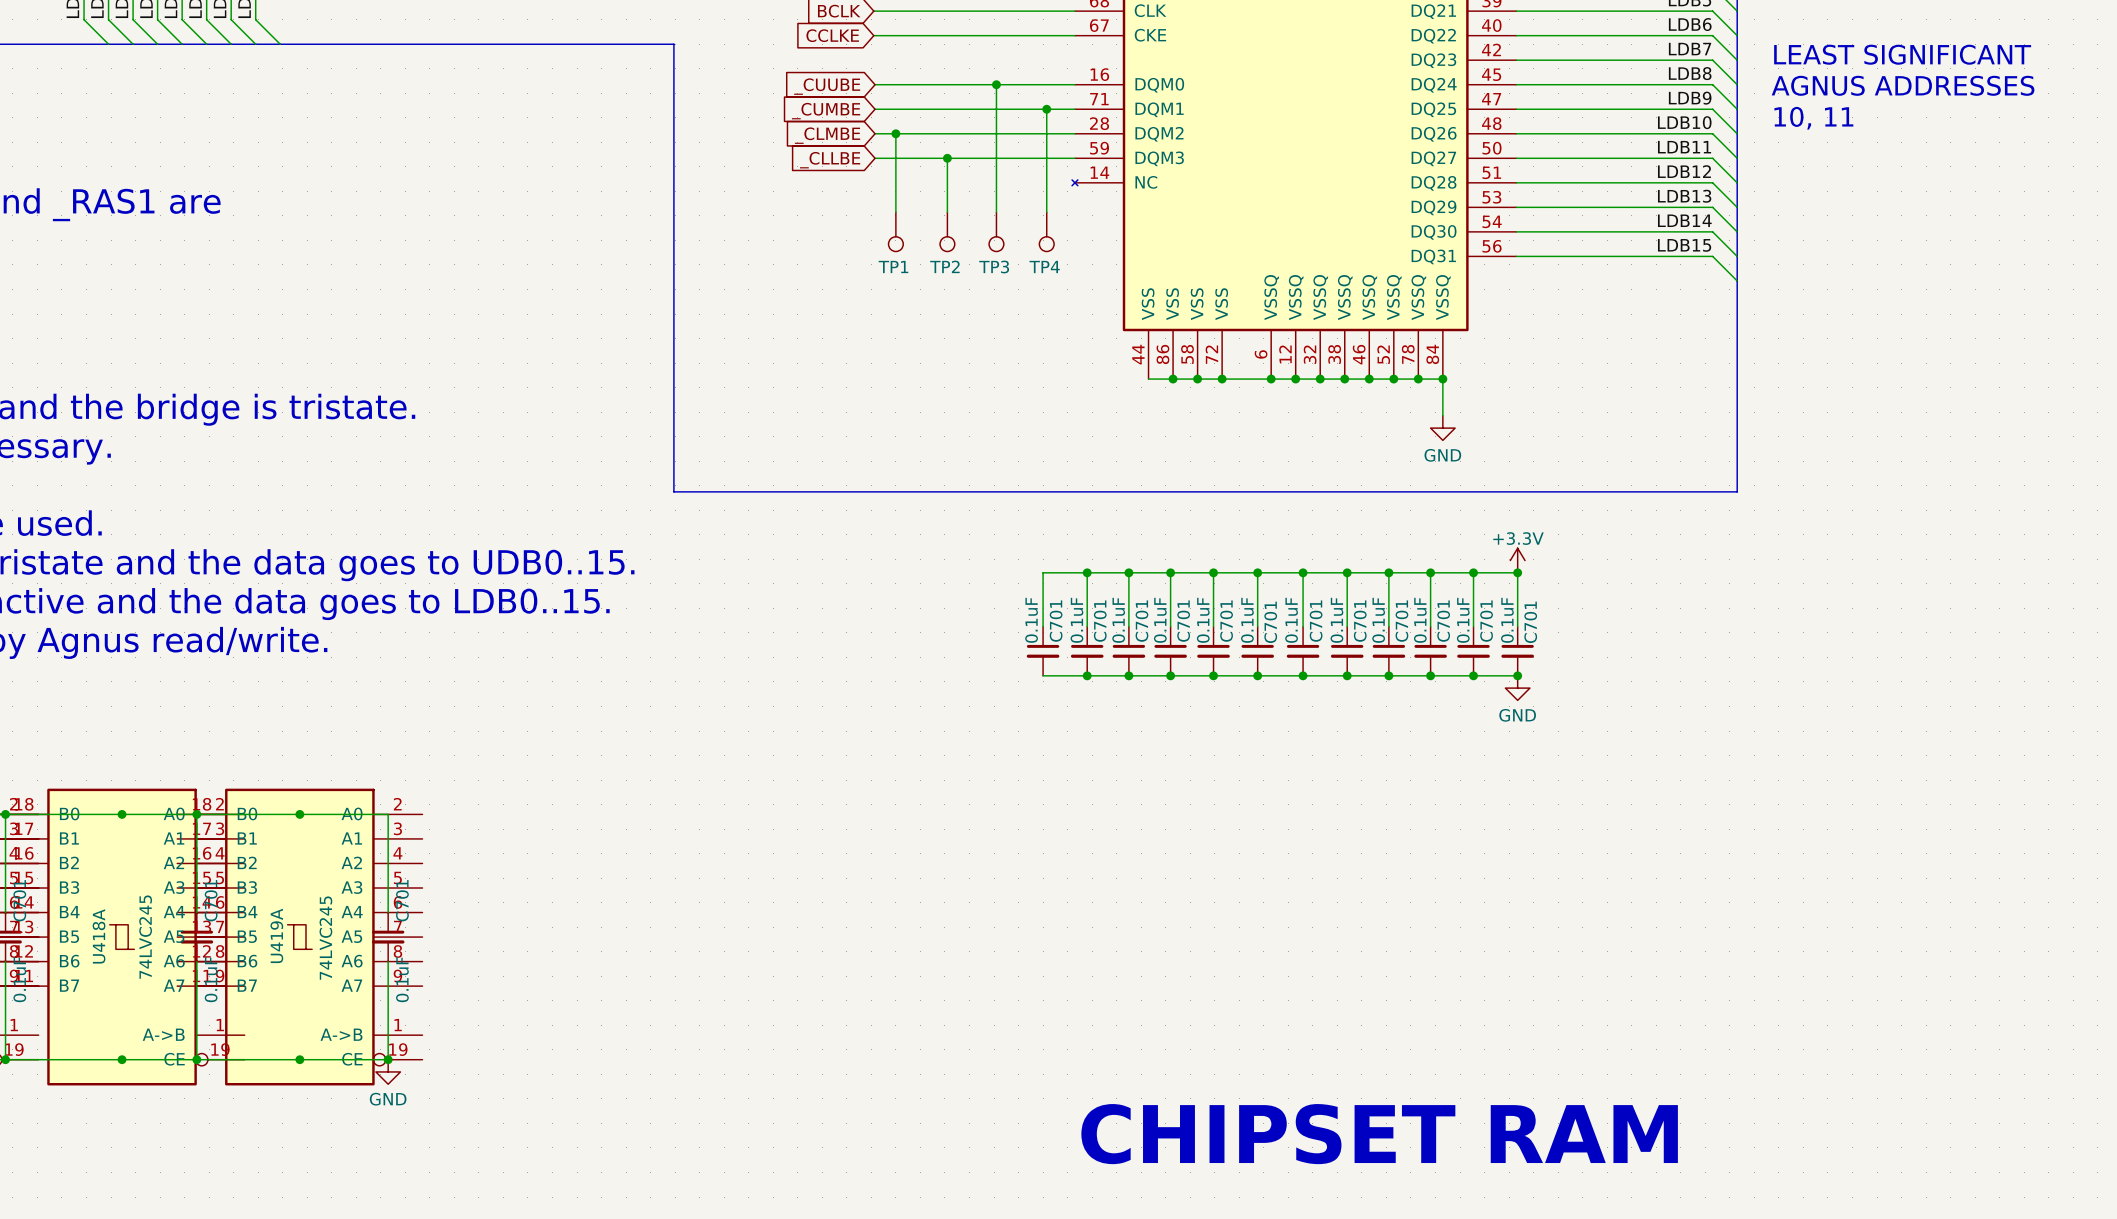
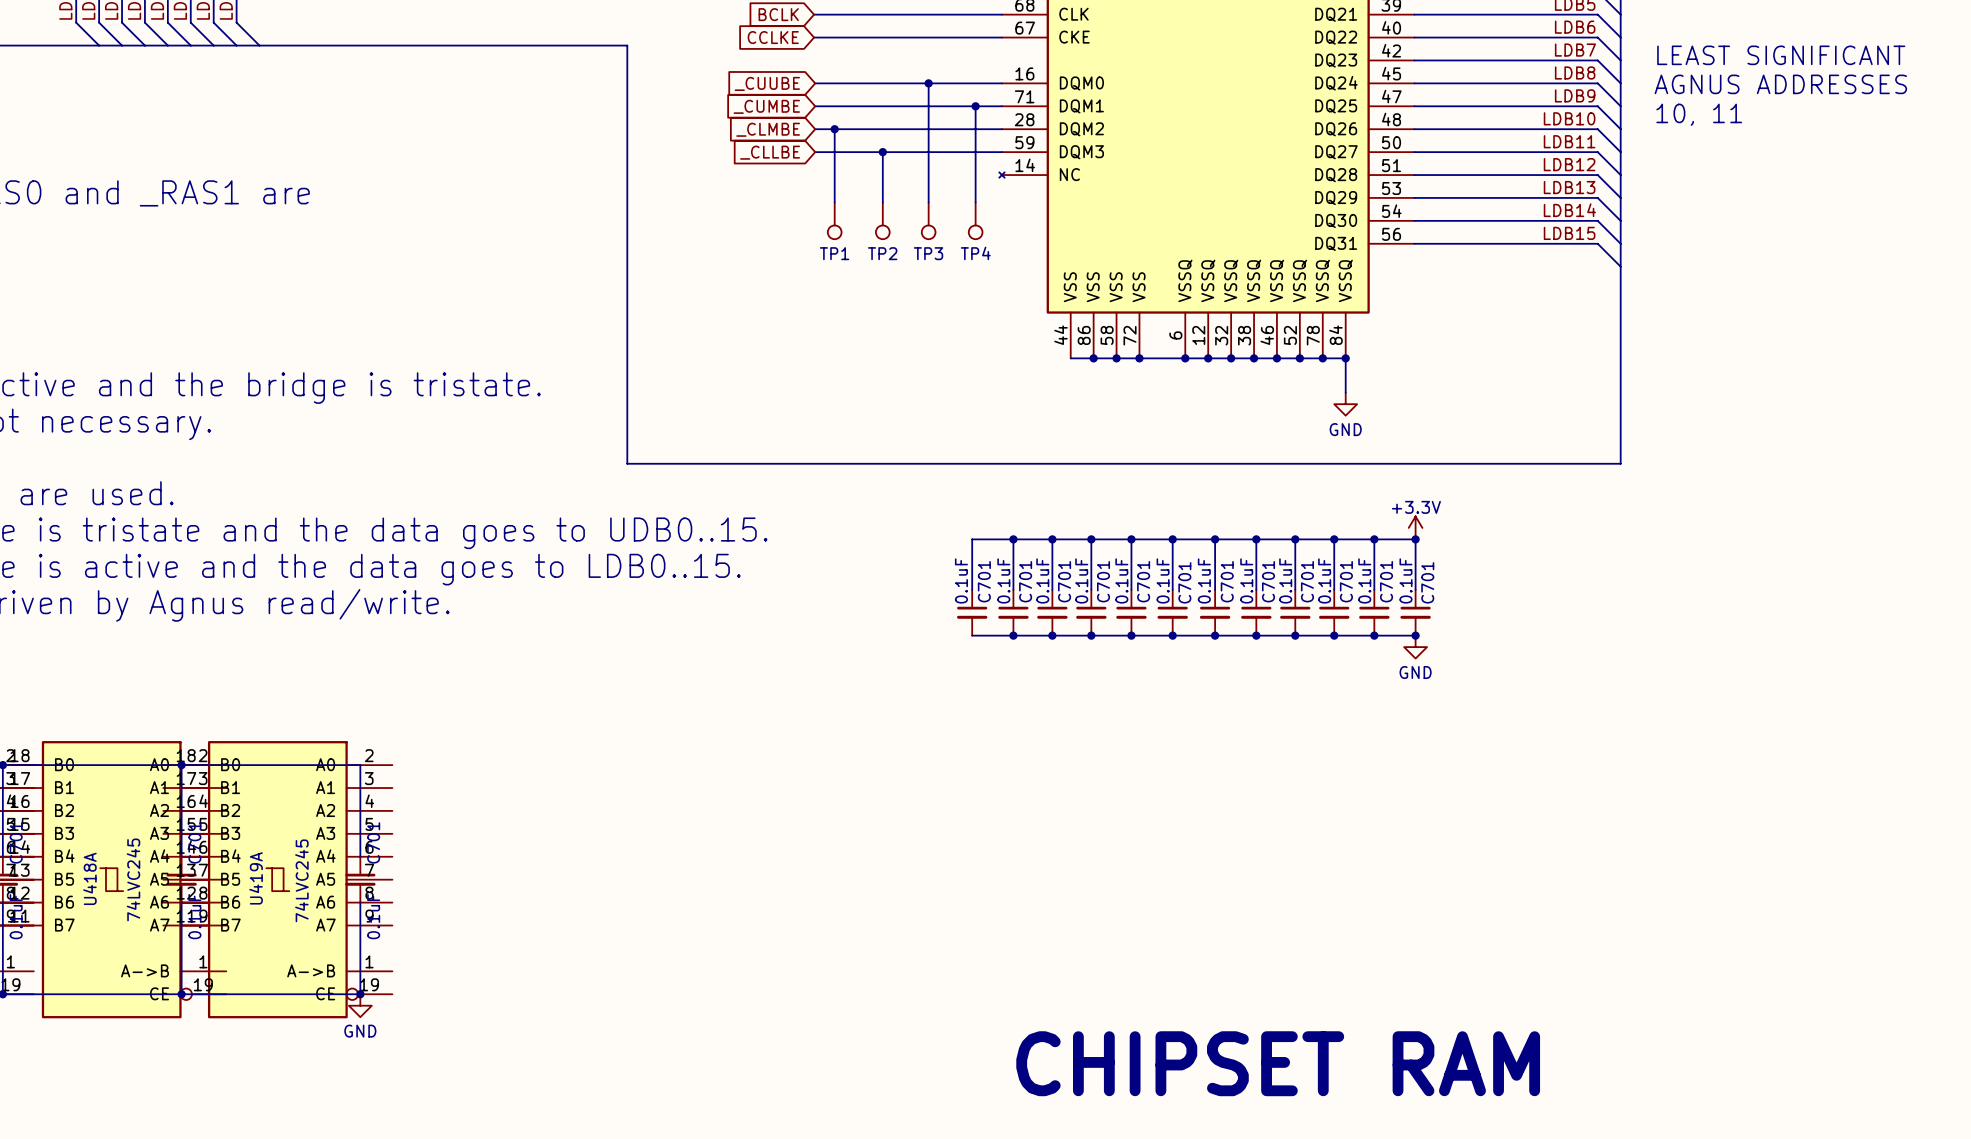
junction: (122, 814) -> none
junction: (299, 814) -> none
junction: (122, 1059) -> none
junction: (299, 1059) -> none

